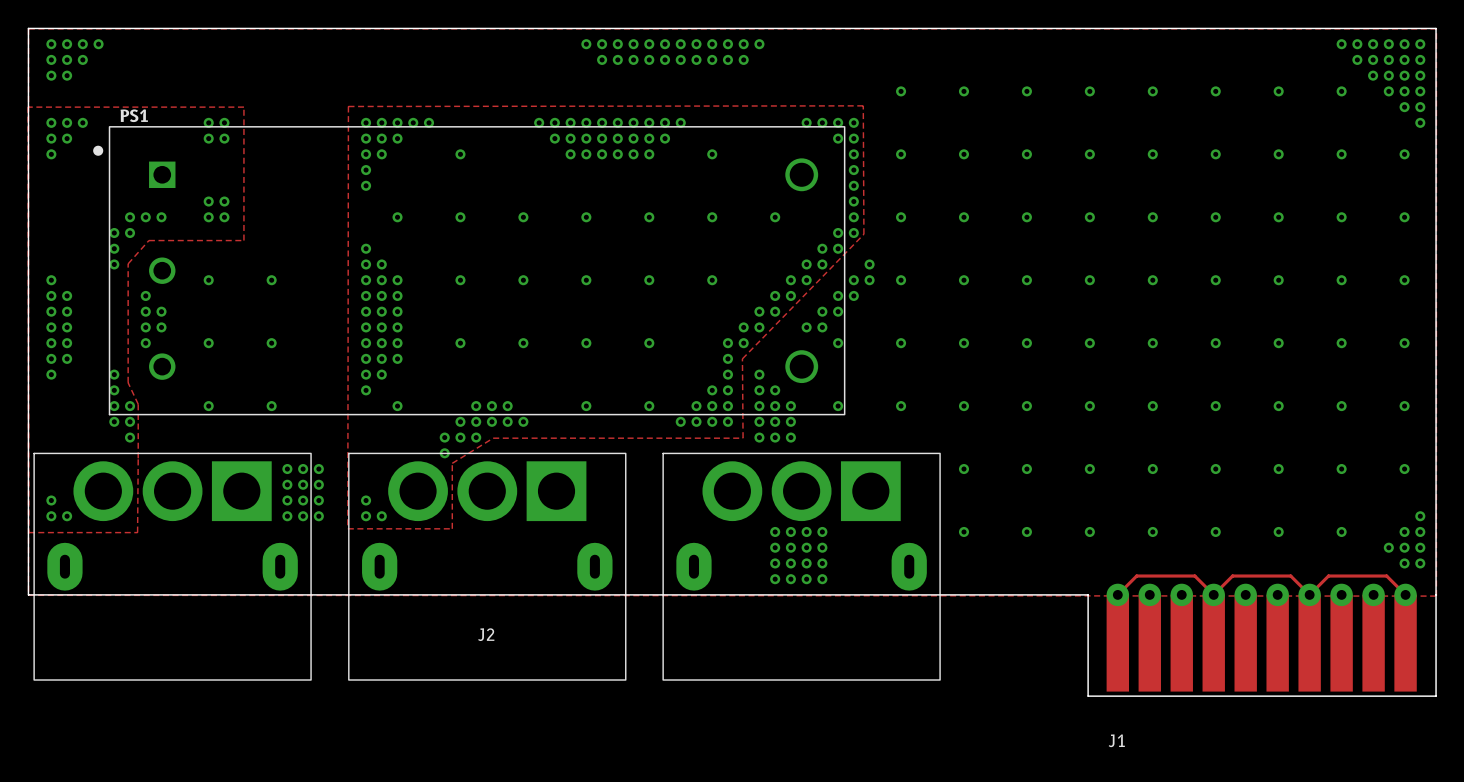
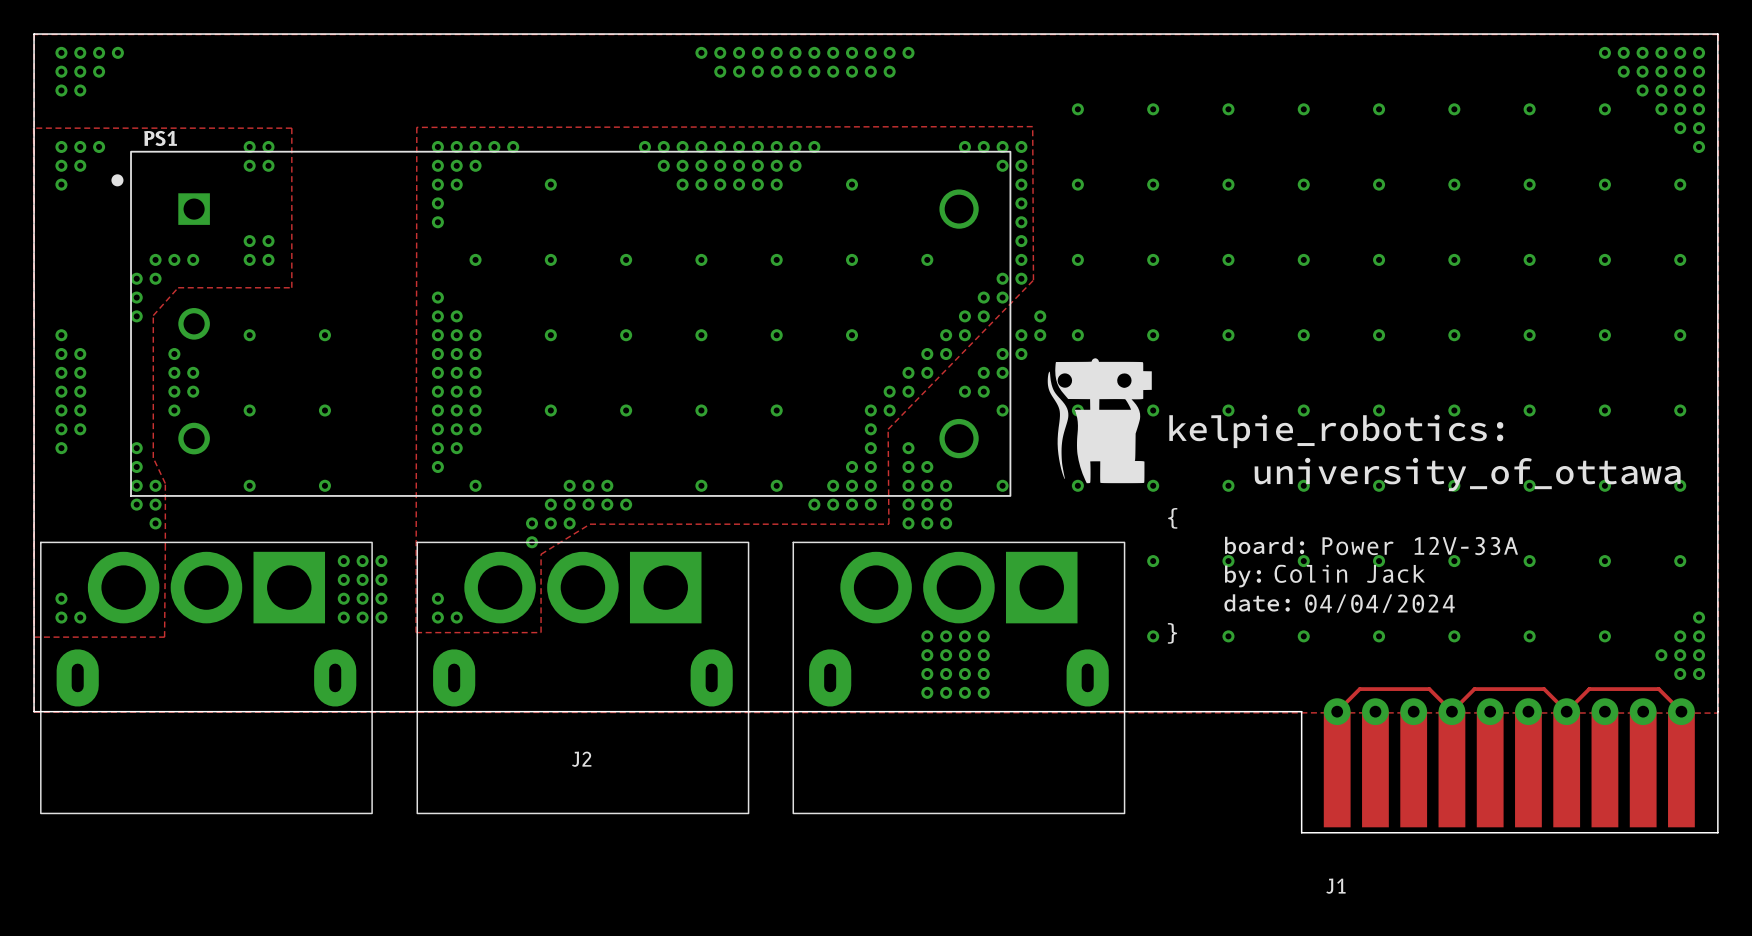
drawing: none -> [1047, 358, 1681, 644]

